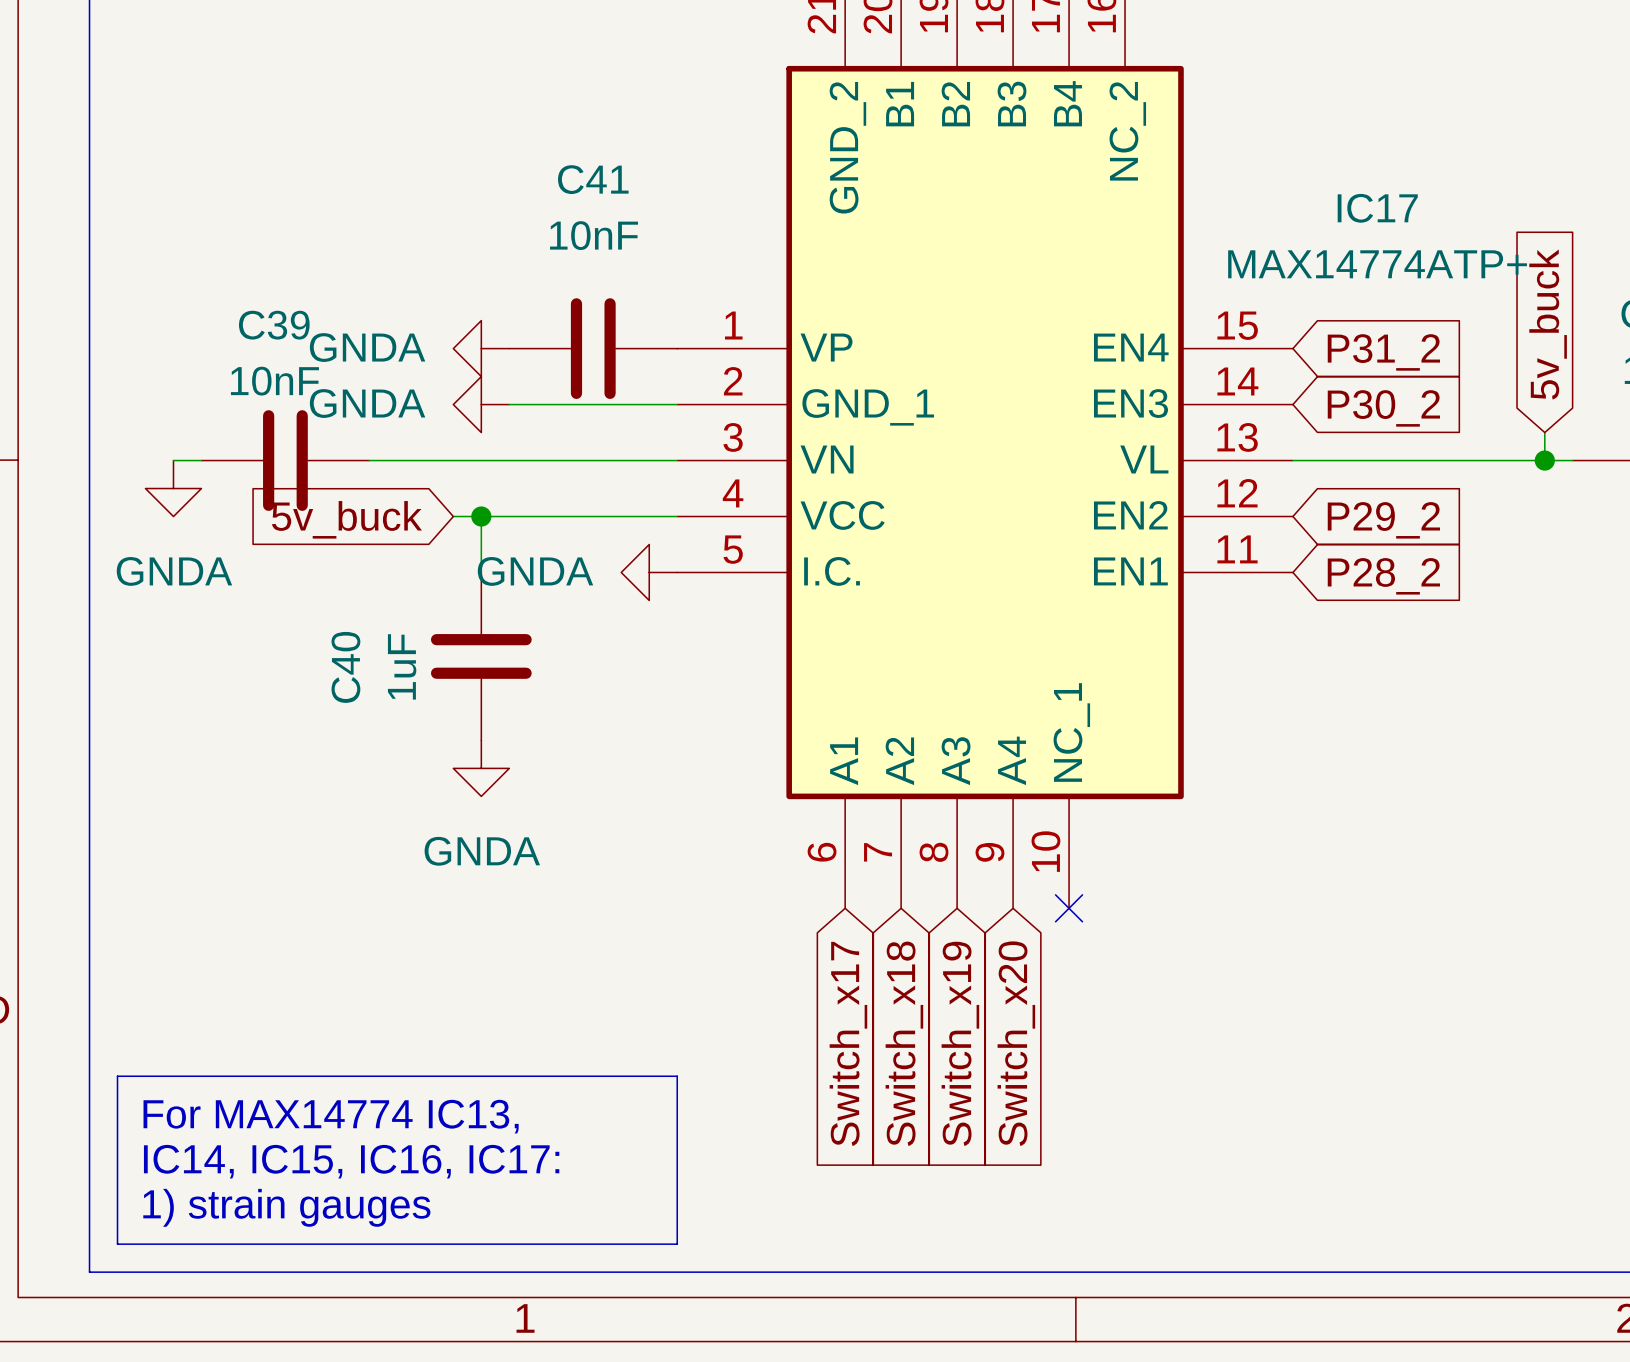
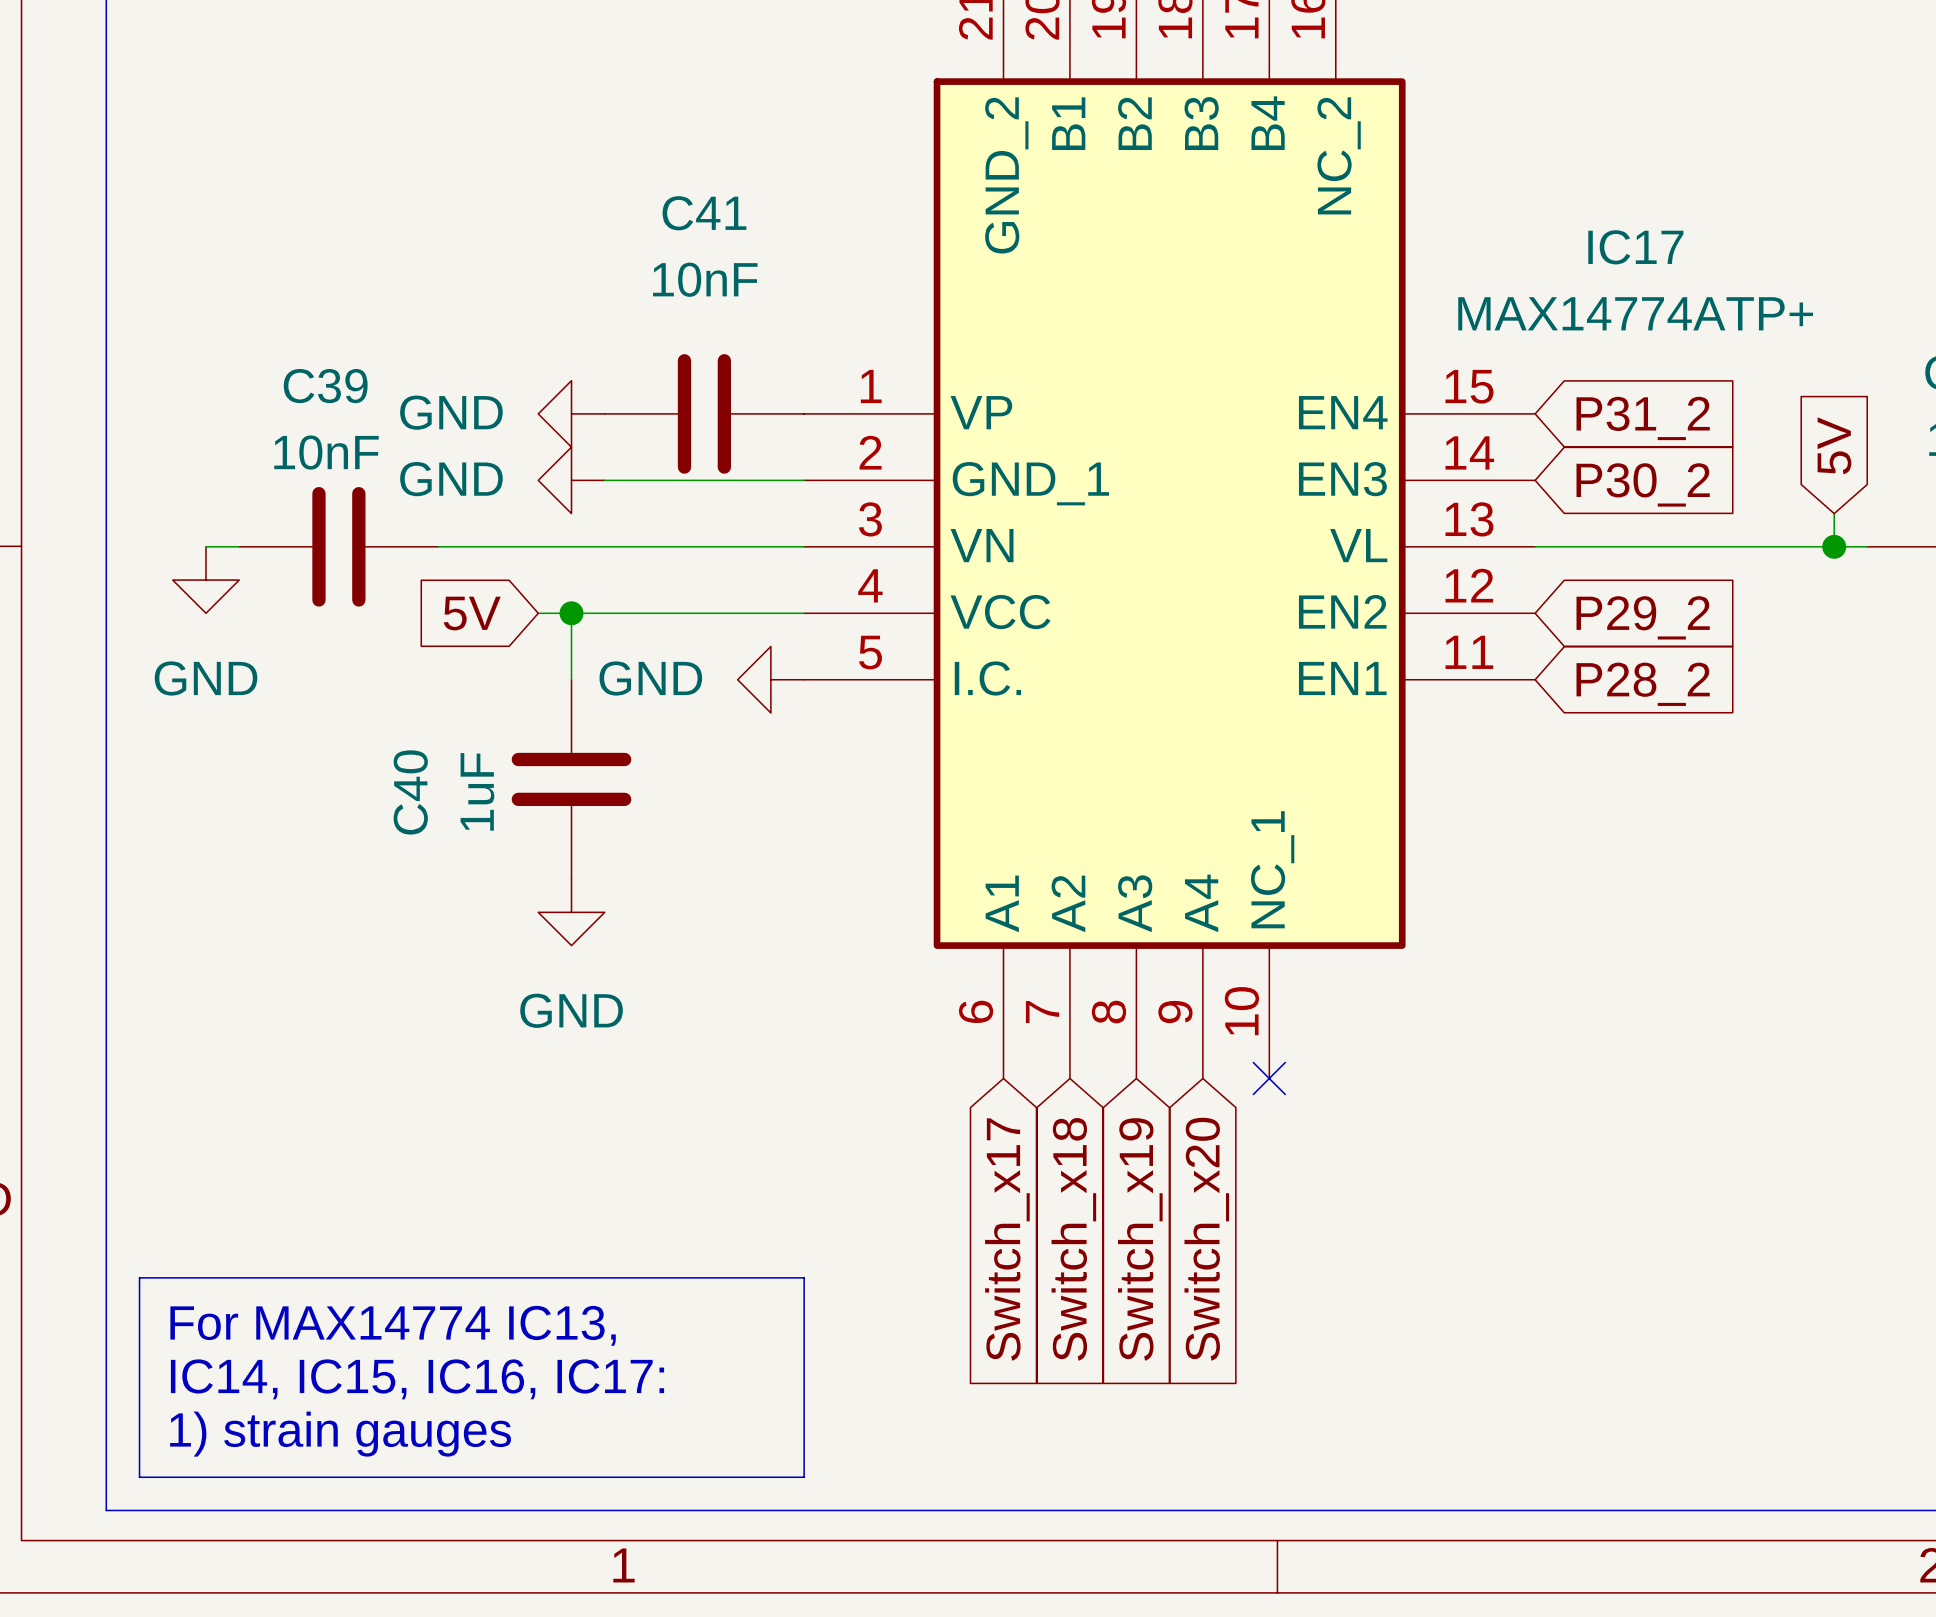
global label: 5v_buck (1548, 324) -> 5V (1834, 445)
power symbol: GNDA (481, 348) -> GND (571, 413)
power symbol: GNDA (481, 404) -> GND (571, 480)
power symbol: GNDA (173, 488) -> GND (205, 580)
global label: 5v_buck (346, 519) -> 5V (472, 613)
power symbol: GNDA (649, 572) -> GND (770, 679)
power symbol: GNDA (481, 768) -> GND (571, 912)

